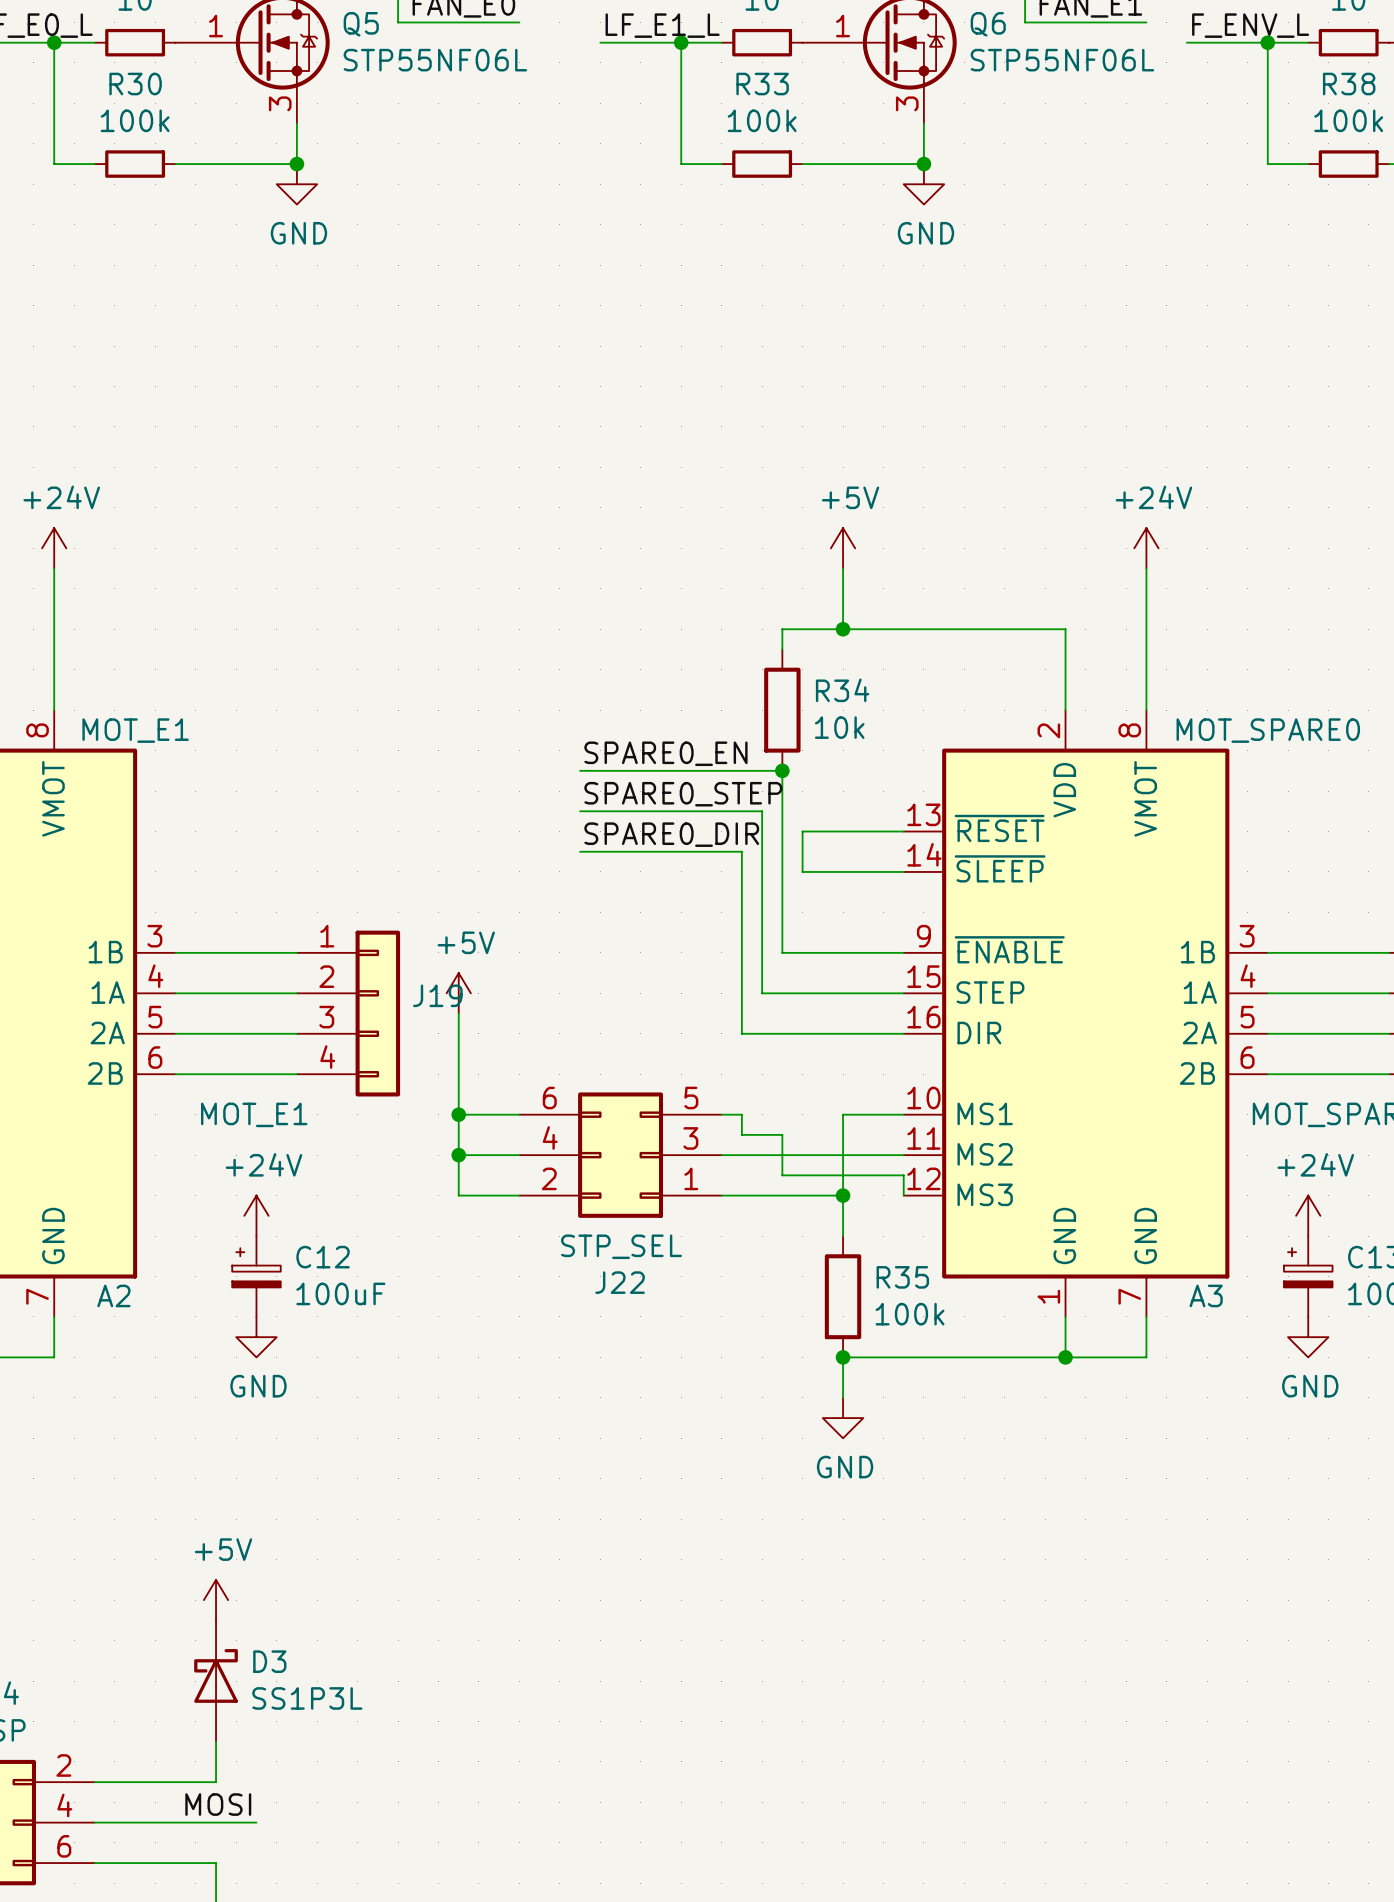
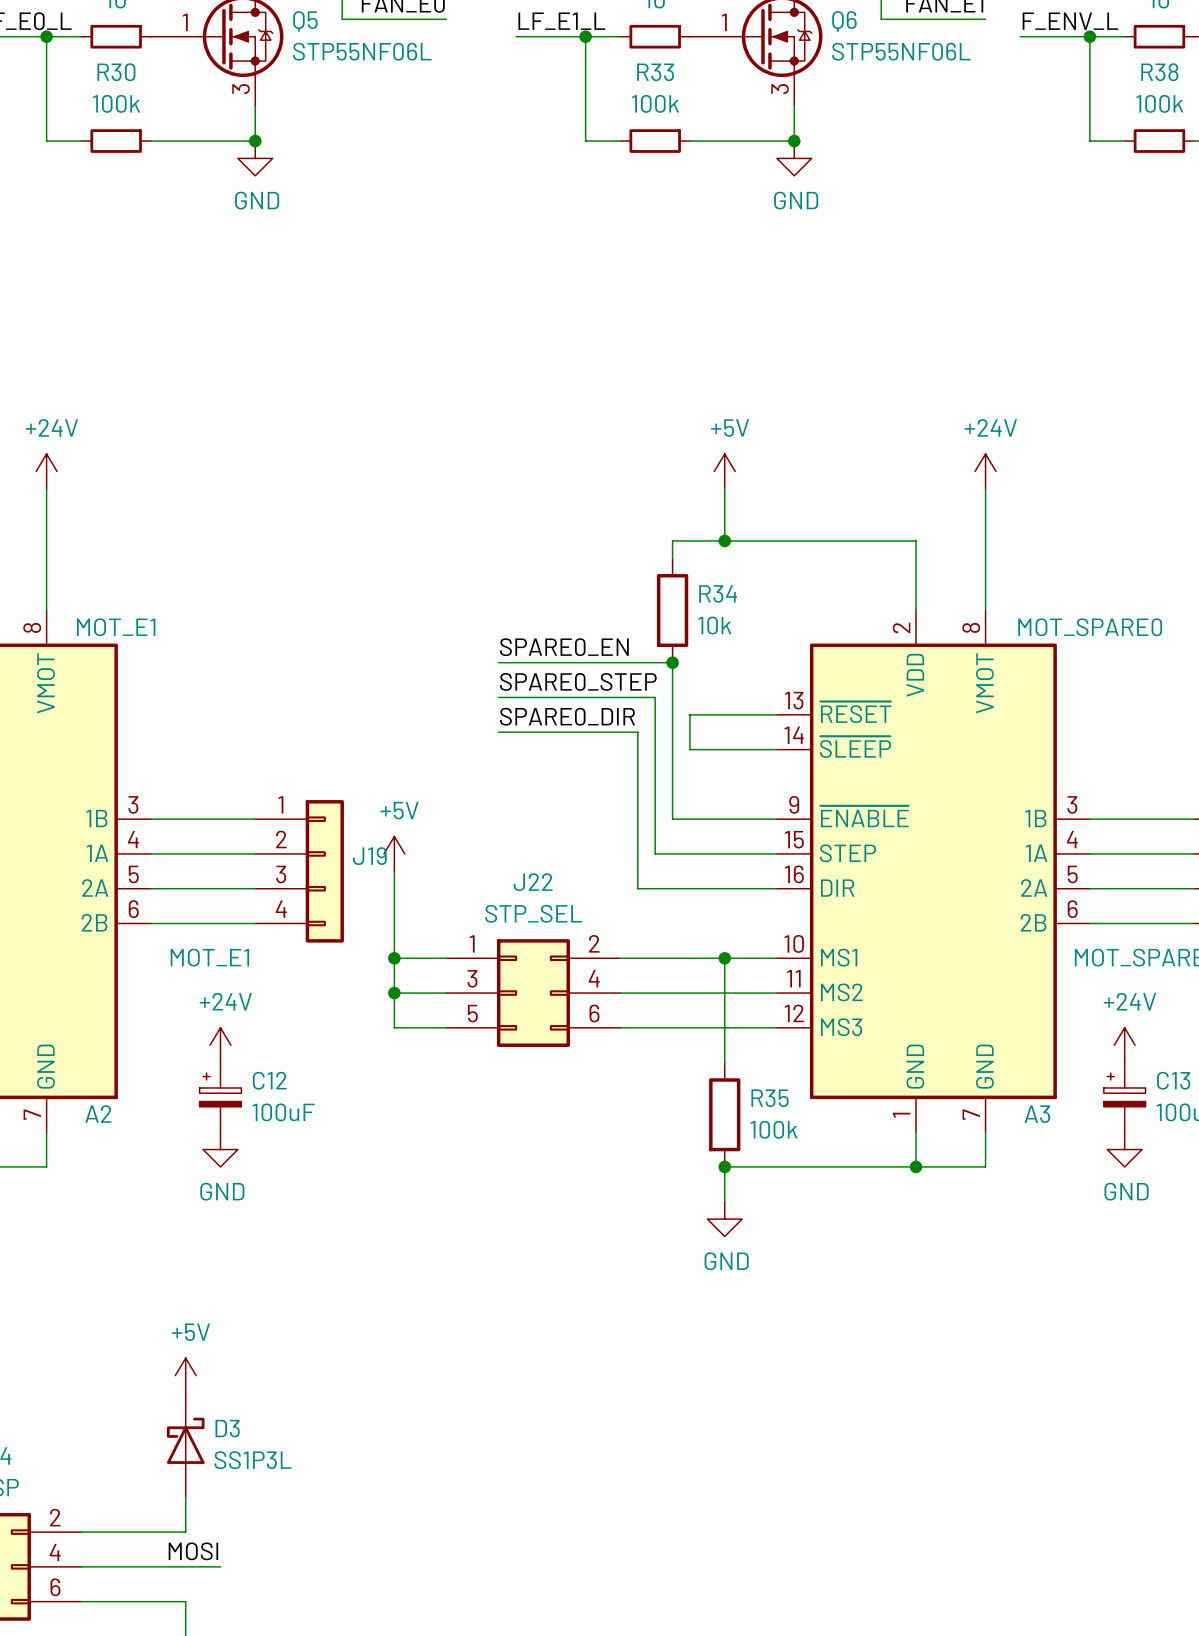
wire: (741, 1114) (741, 1134) (782, 1134) (782, 1175) (903, 1175) (903, 1195) -> (637, 958) (724, 958)
J22 rotation: 0° (620, 1155) -> 180° (533, 993)
wire: none -> (724, 1027) (776, 1027)
junction position: (843, 1195) -> (724, 958)

